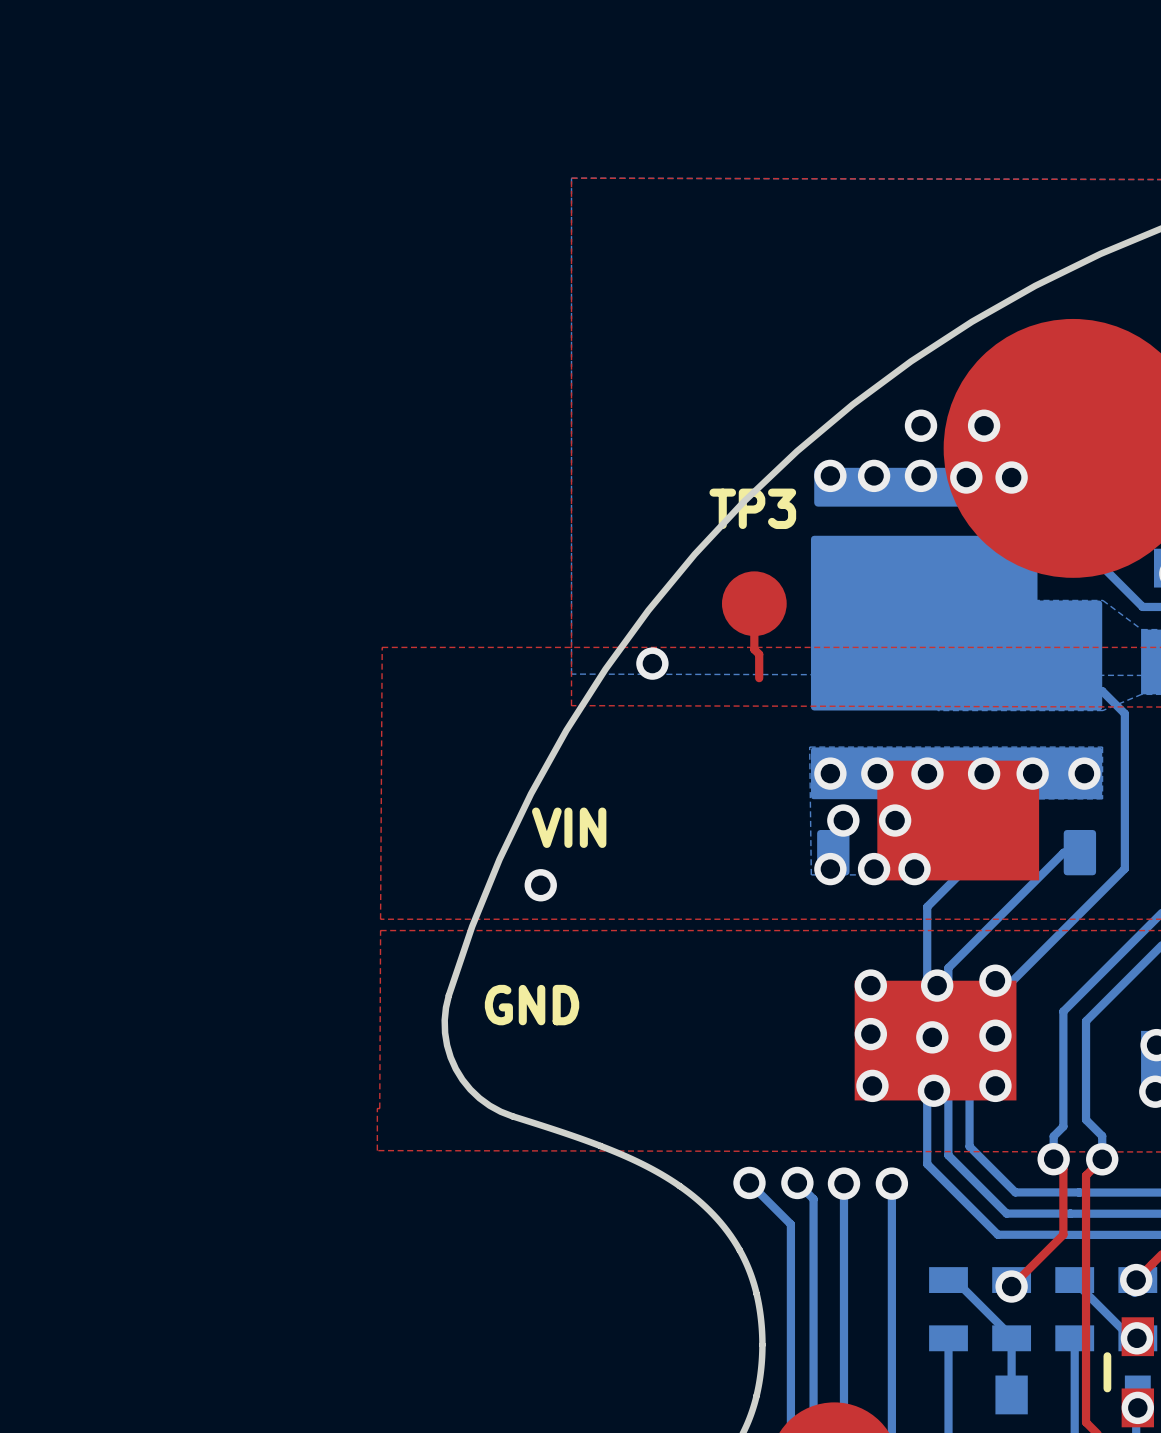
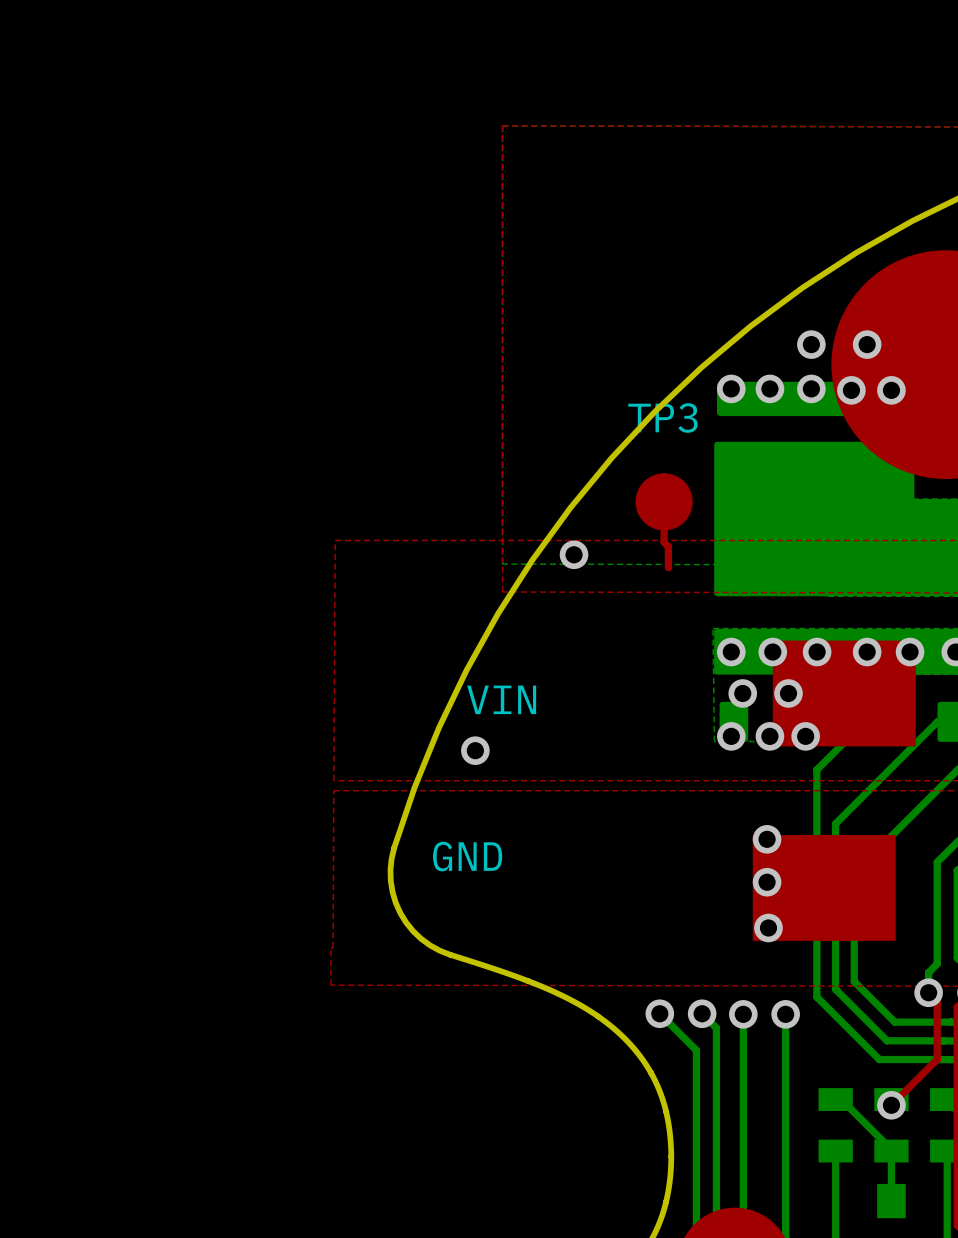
via: (995, 980) -> none
via: (937, 985) -> none
via: (995, 1035) -> none
via: (932, 1037) -> none
via: (995, 1085) -> none
via: (933, 1090) -> none

